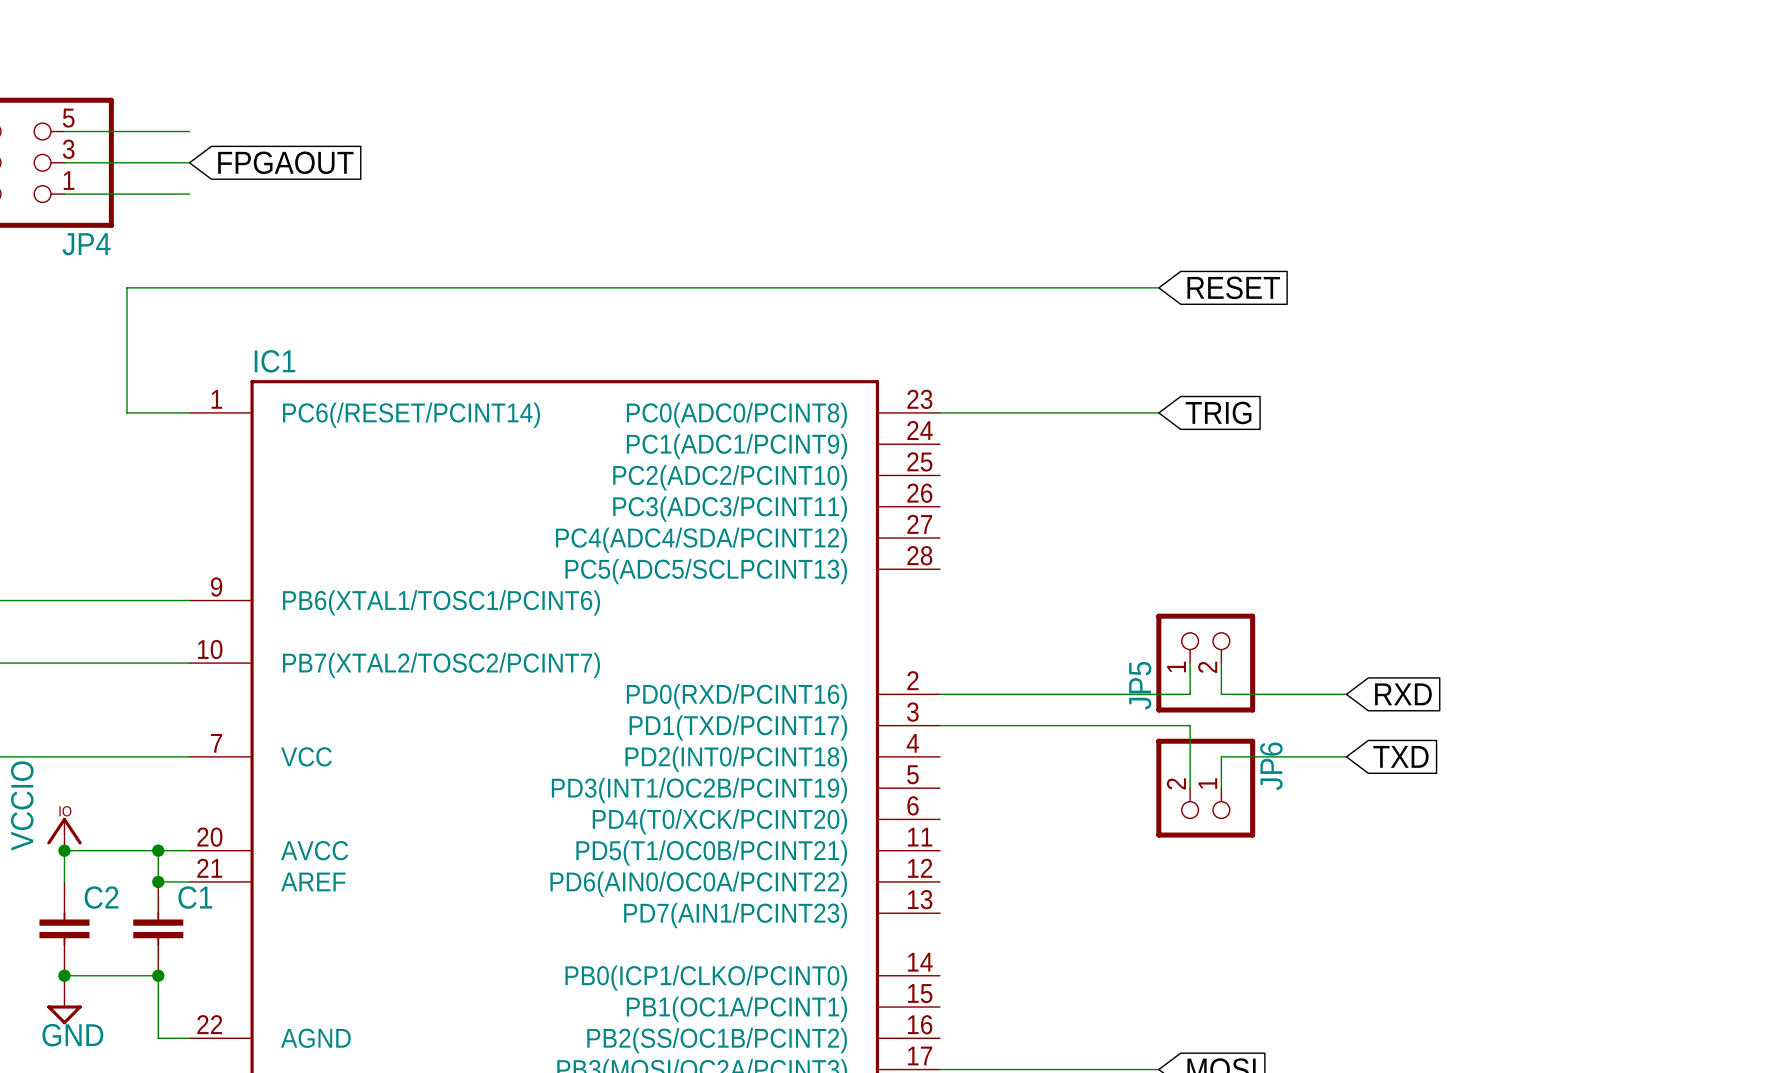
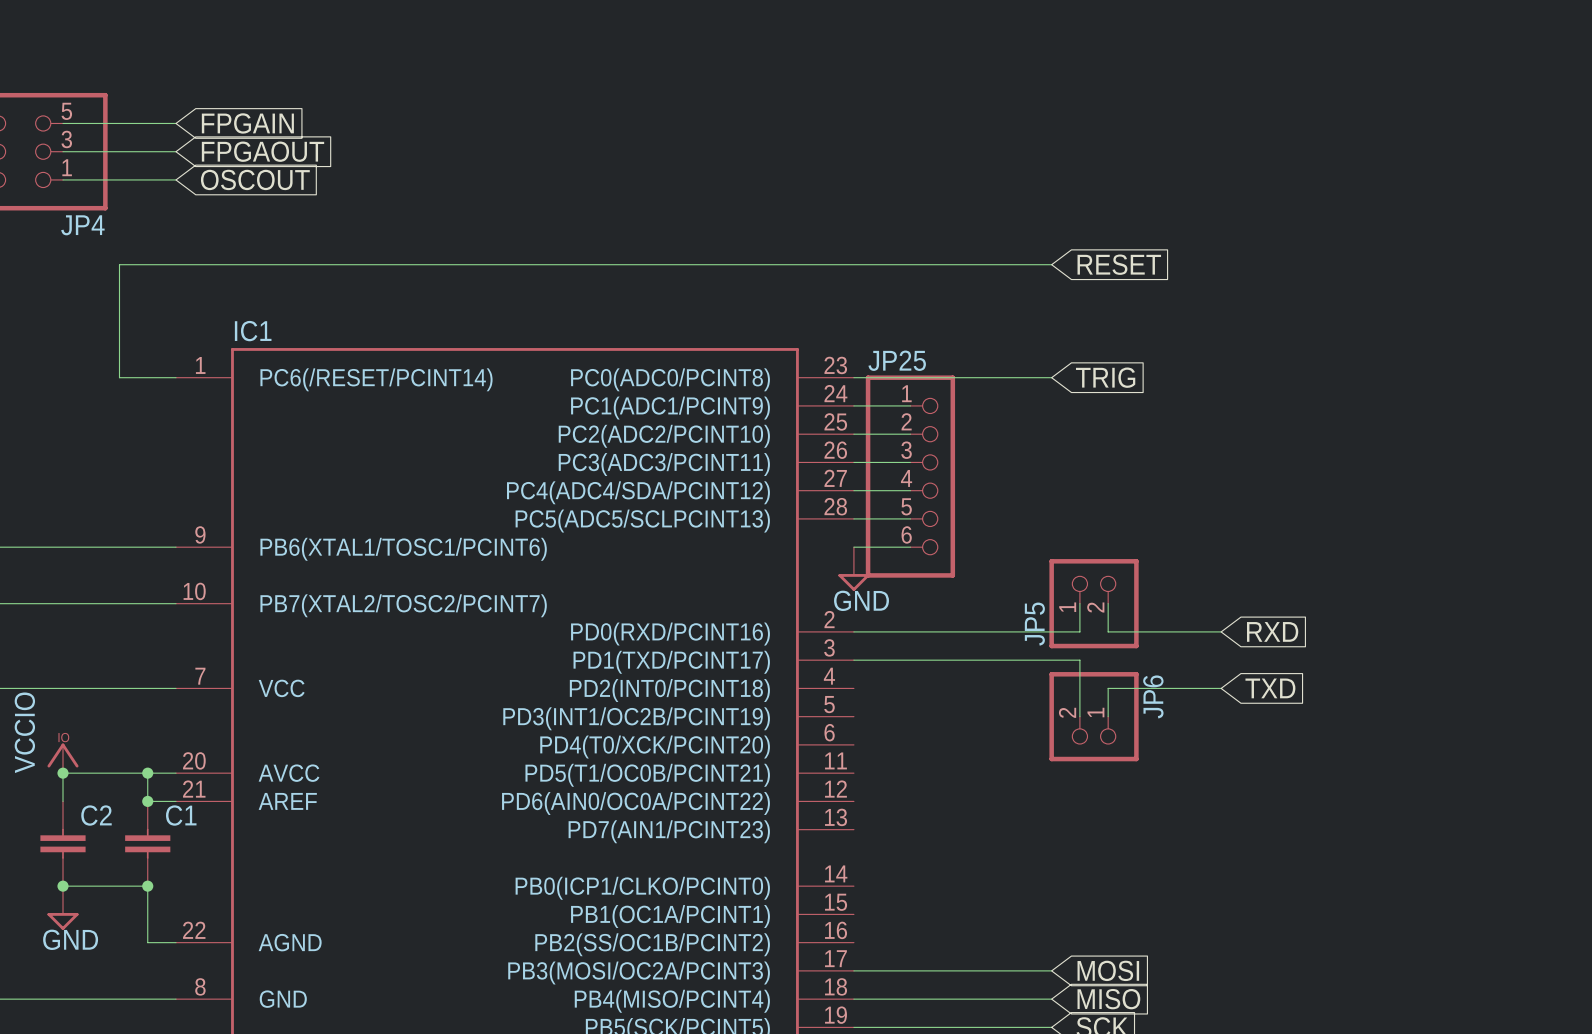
global label: none -> FPGAIN (247, 123)
global label: none -> OSCOUT (255, 179)
wire: none -> (853, 405) (910, 405)
wire: none -> (853, 434) (910, 434)
wire: none -> (853, 462) (910, 462)
JP25: none -> (910, 476)
wire: none -> (853, 490) (910, 490)
wire: none -> (853, 518) (910, 518)
wire: none -> (853, 547) (910, 547)
power symbol: none -> GND (853, 569)

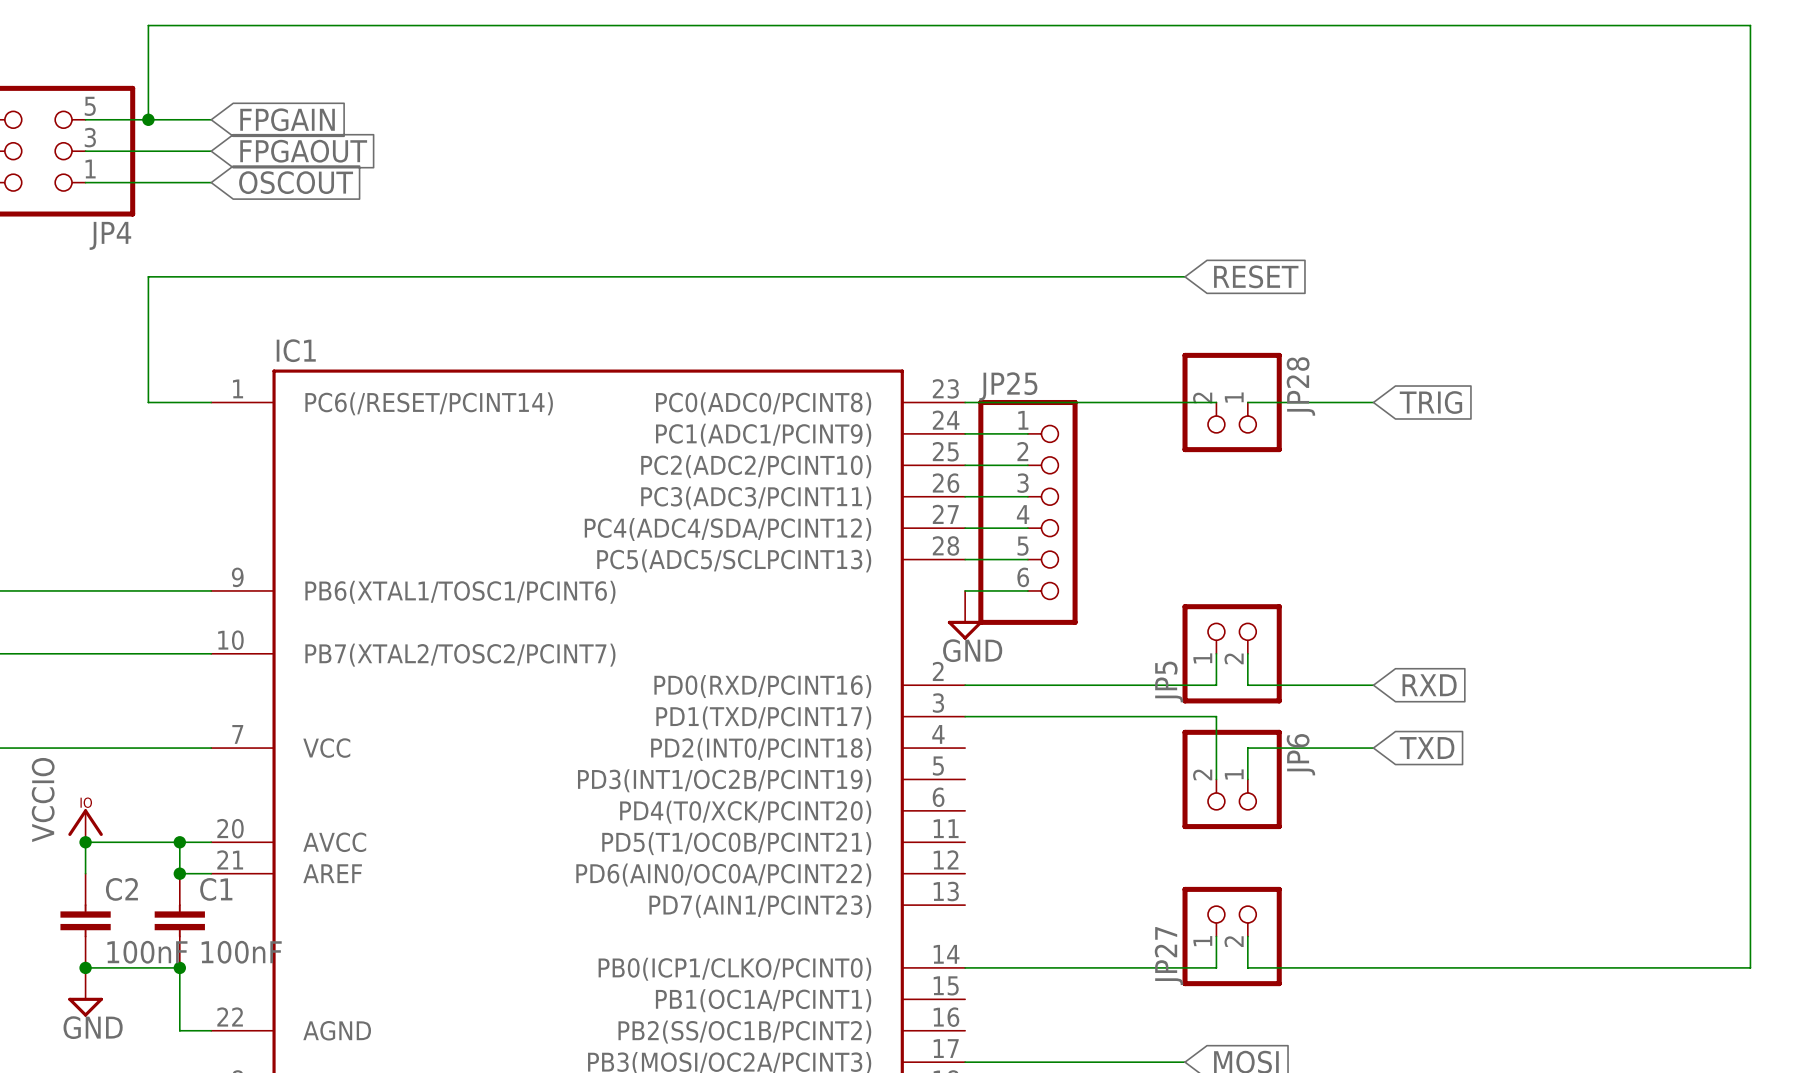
wire: none -> (148, 119) (148, 25) (1750, 25) (1750, 967) (1247, 967) (1247, 936)
junction: none -> (148, 119)
wire: none -> (1185, 402) (1216, 402)
JP28: none -> (1232, 402)
global label position: TRIG (1105, 377) -> TRIG (1430, 402)
wire: none -> (1247, 402) (1373, 402)
wire: none -> (1216, 936) (1216, 967) (965, 967)
JP27: none -> (1232, 936)
C2 value: none -> 100nF (147, 952)
C1 value: none -> 100nF (241, 952)

